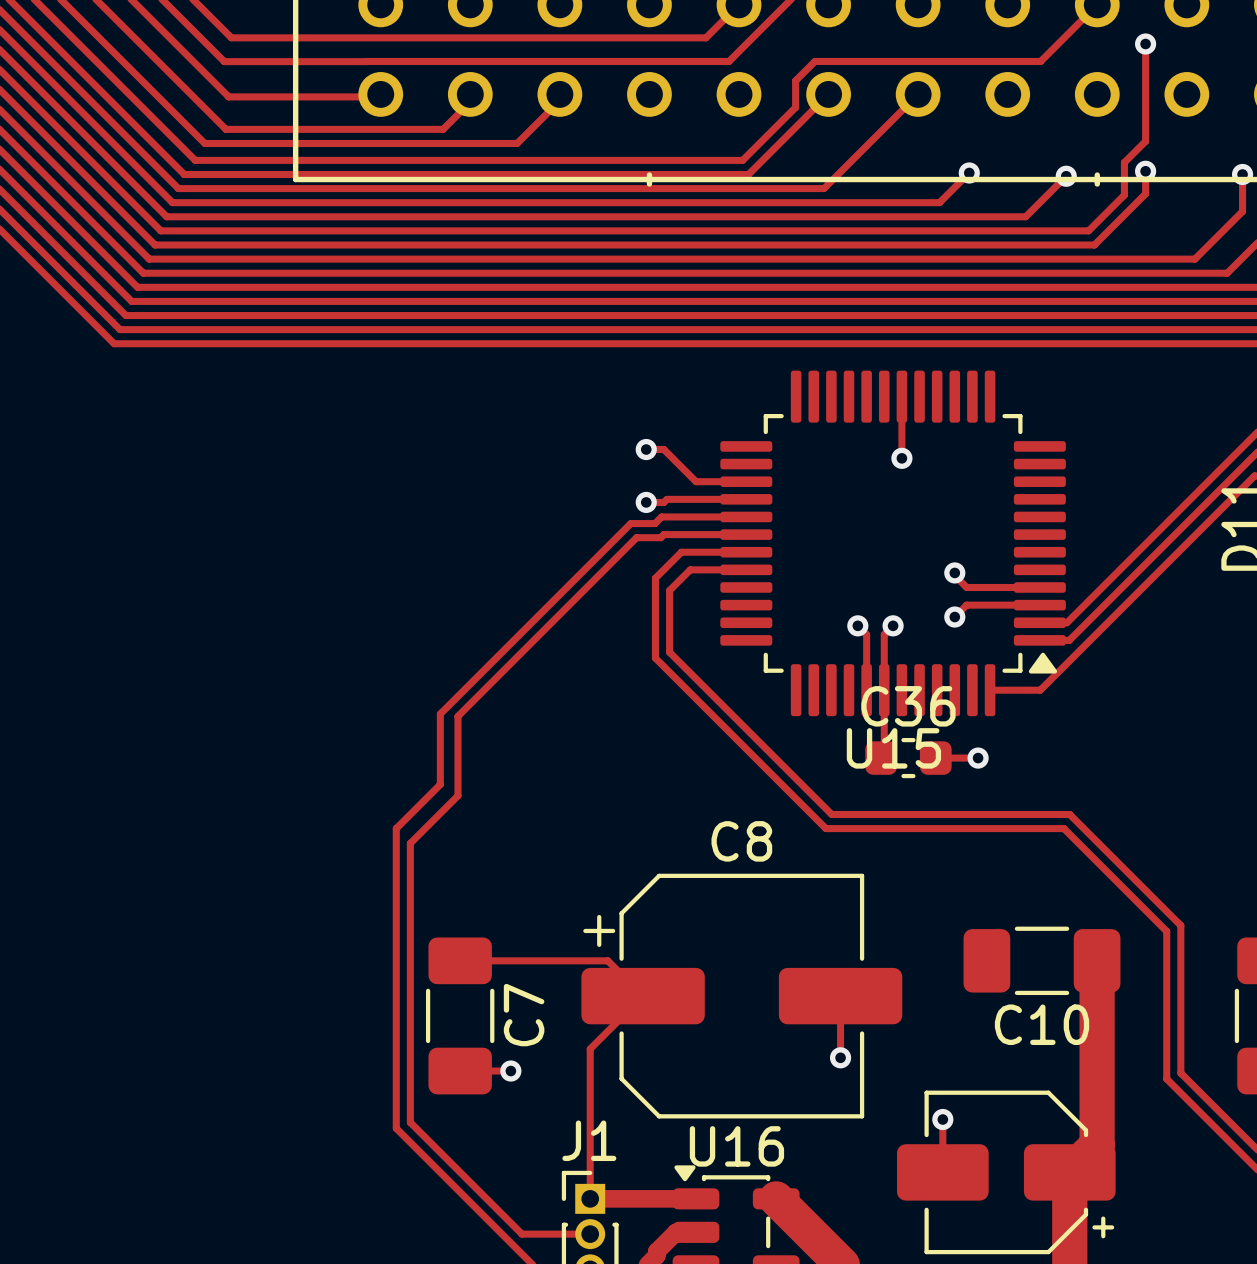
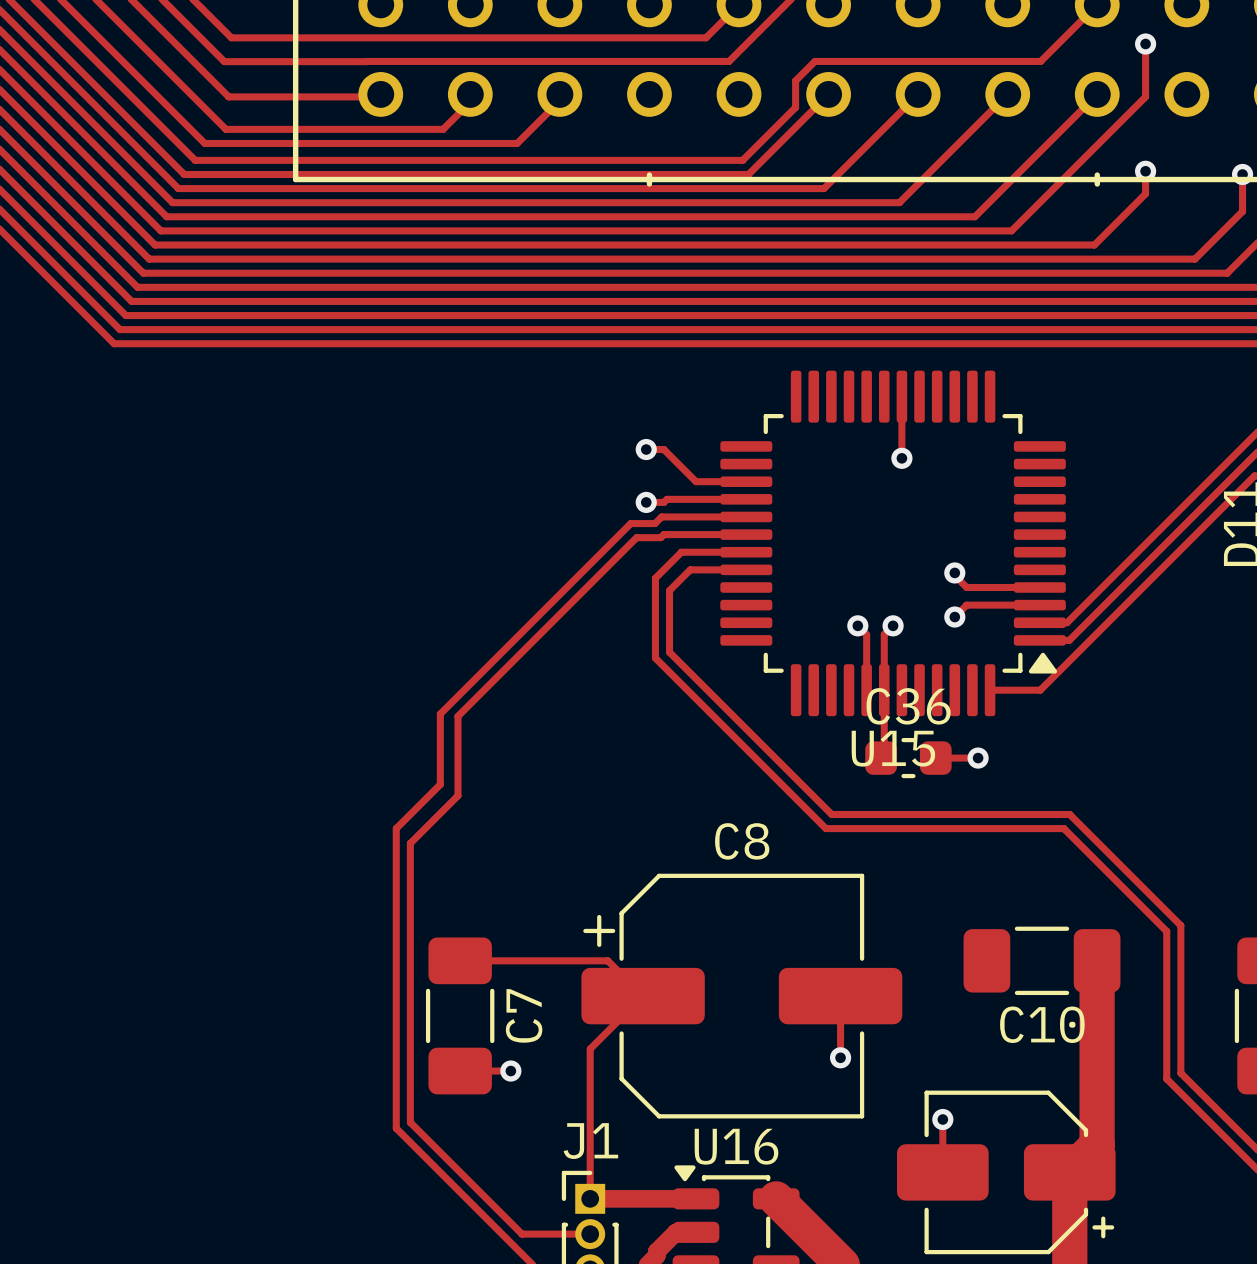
track: none -> (1097, 94) (974, 216)
track: (1145, 96) (1145, 141) (1124, 162) (1124, 195) (1088, 230) (1011, 230) -> (1145, 96) (1066, 176)
track: (969, 172) (939, 202) (899, 202) -> (1007, 94) (899, 202)
via: (969, 172) -> none
via: (1066, 176) -> none
track: (974, 216) (1025, 216) -> (1011, 230) (1025, 216)

